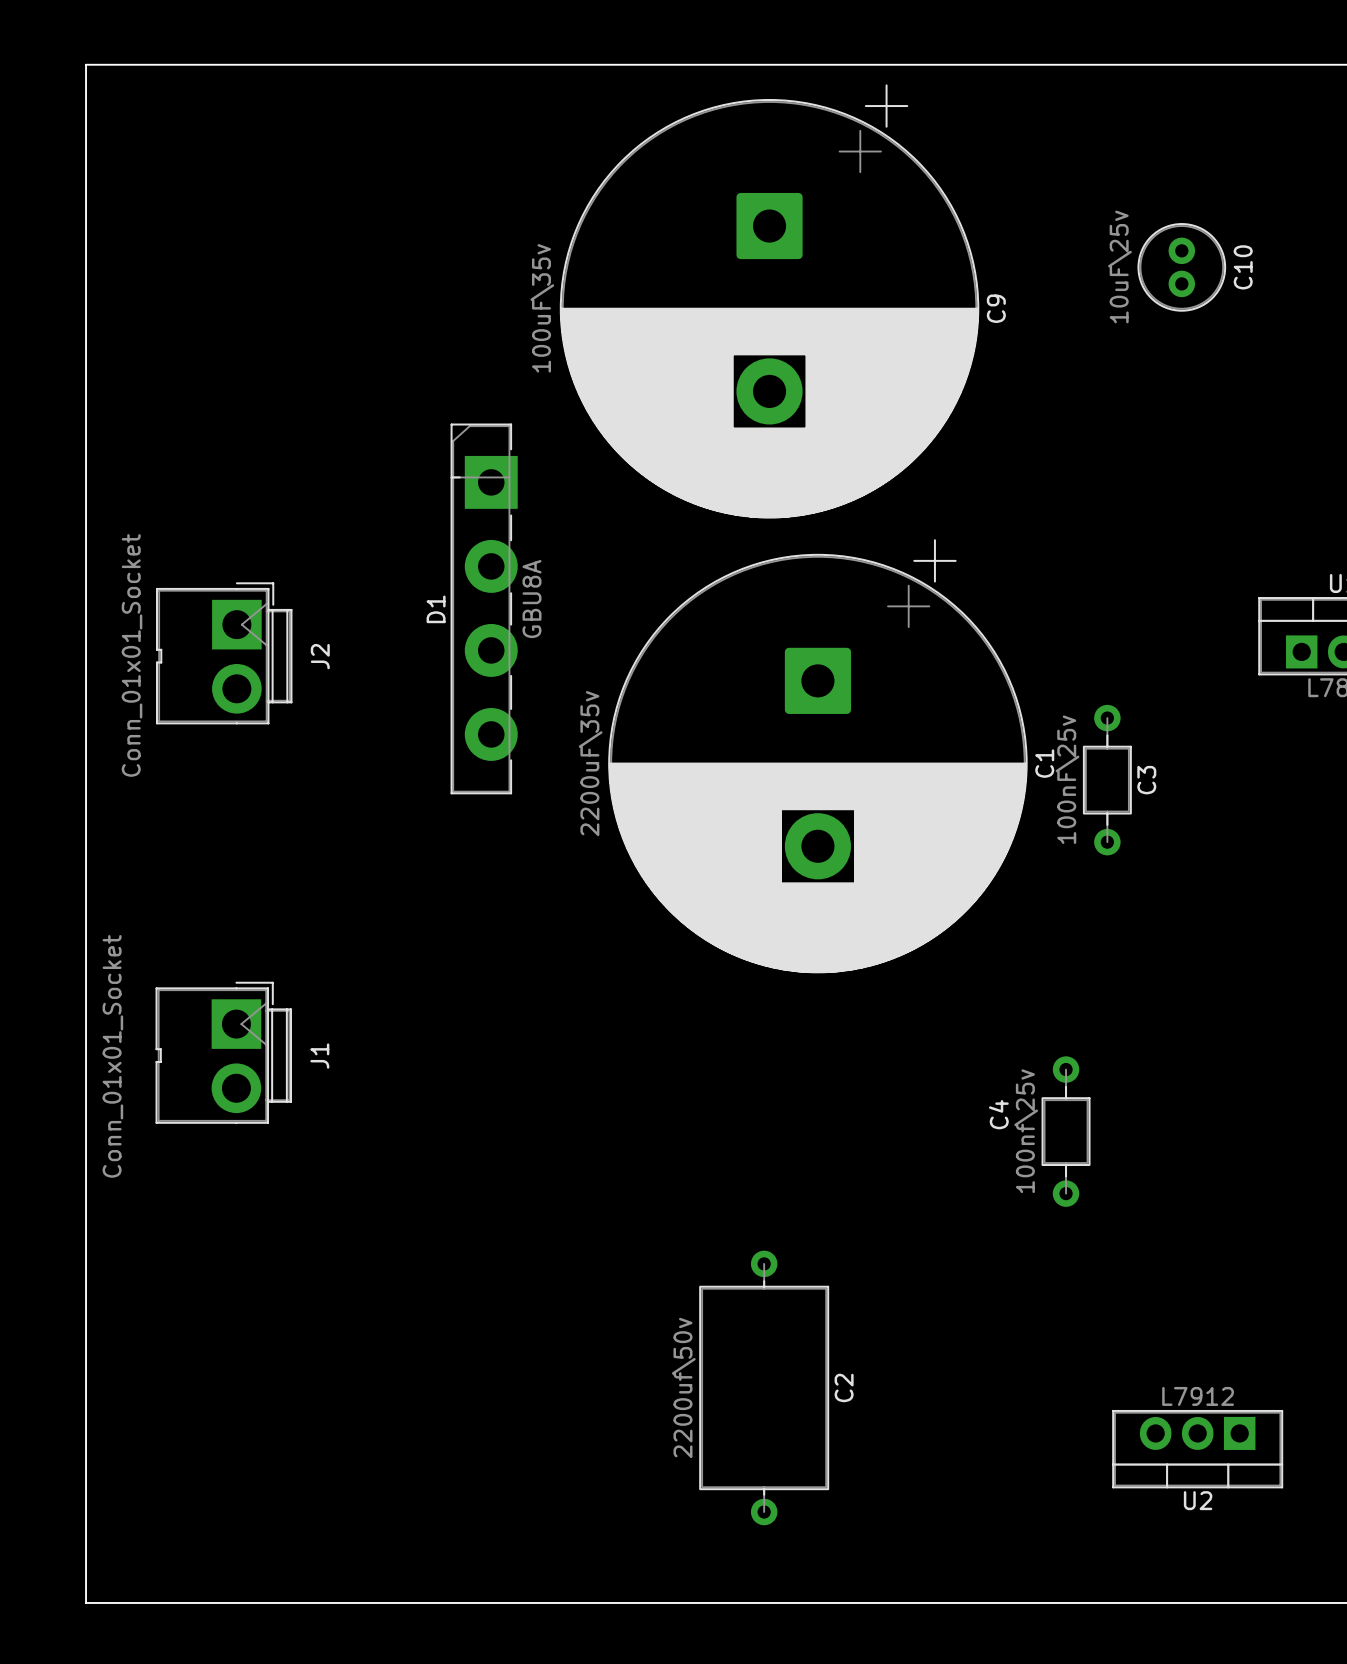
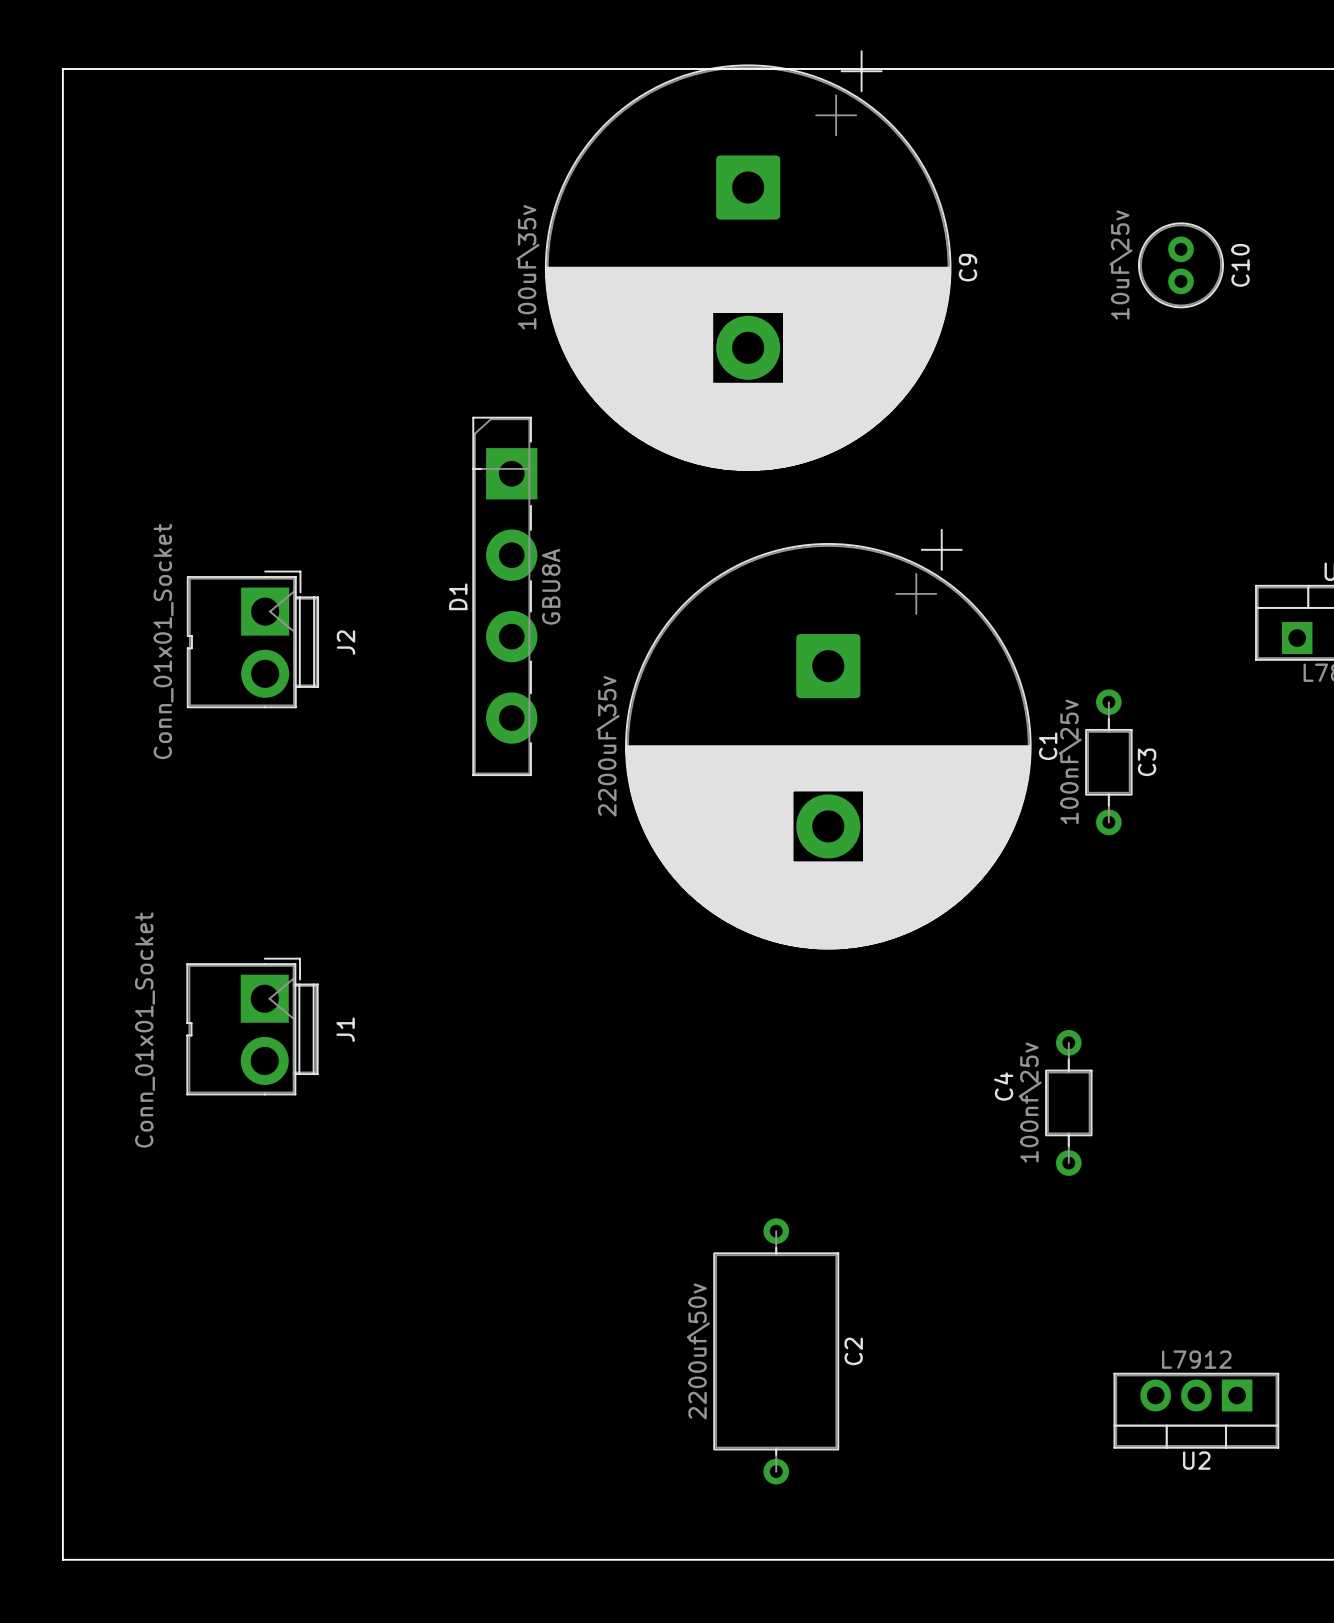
board edge: (86, 64) (86, 1602) -> (118, 68) (62, 68) (62, 1559) (118, 1559)
C9 position: (769, 301) -> (748, 260)

